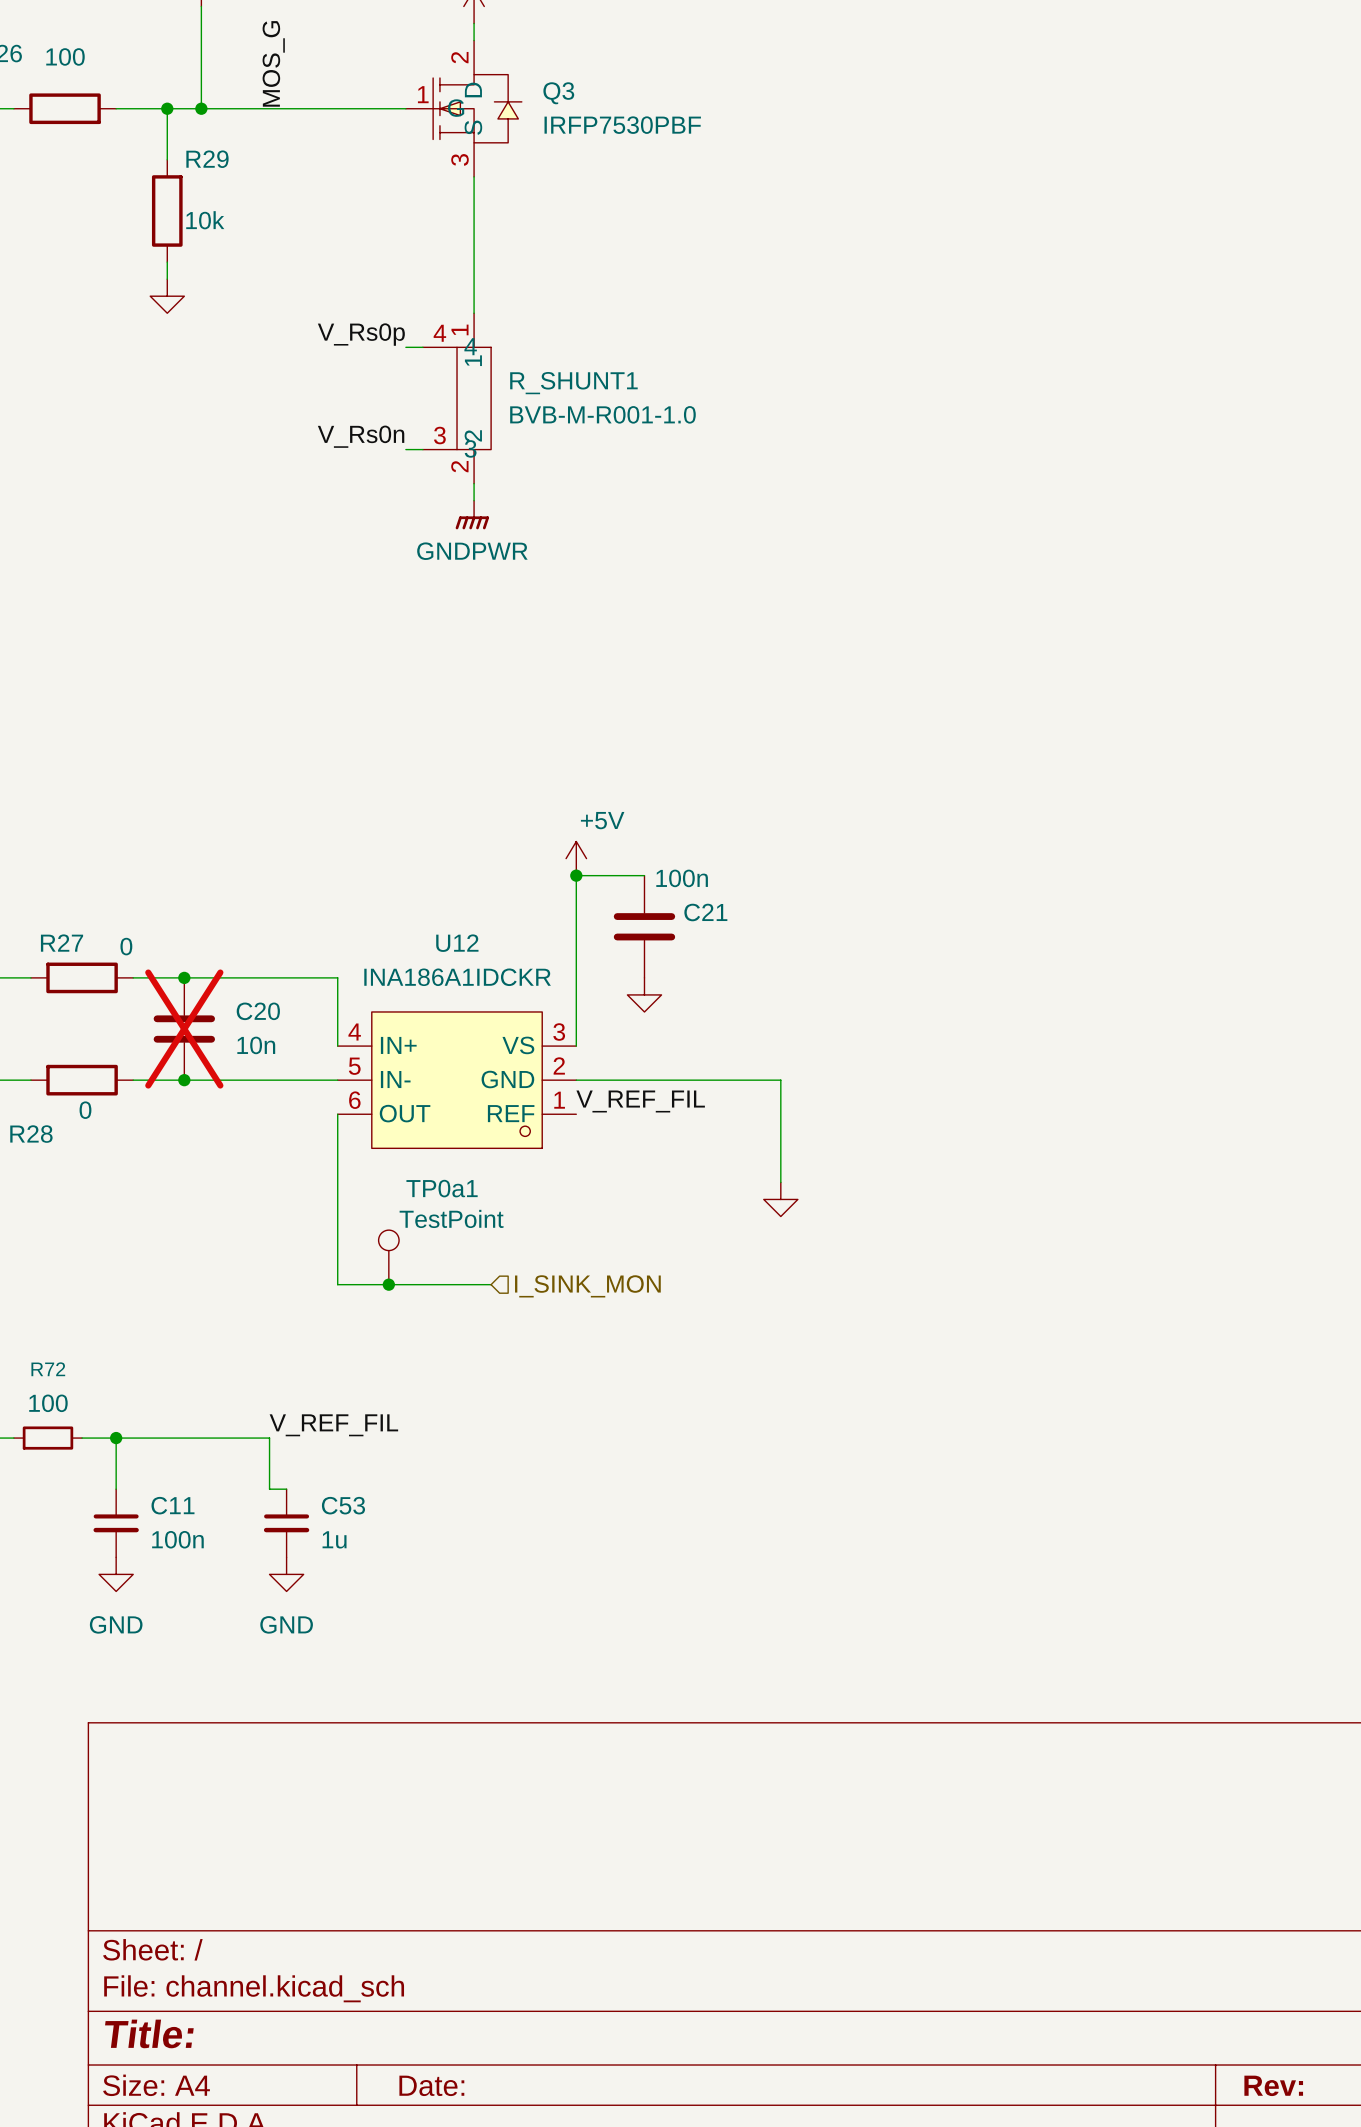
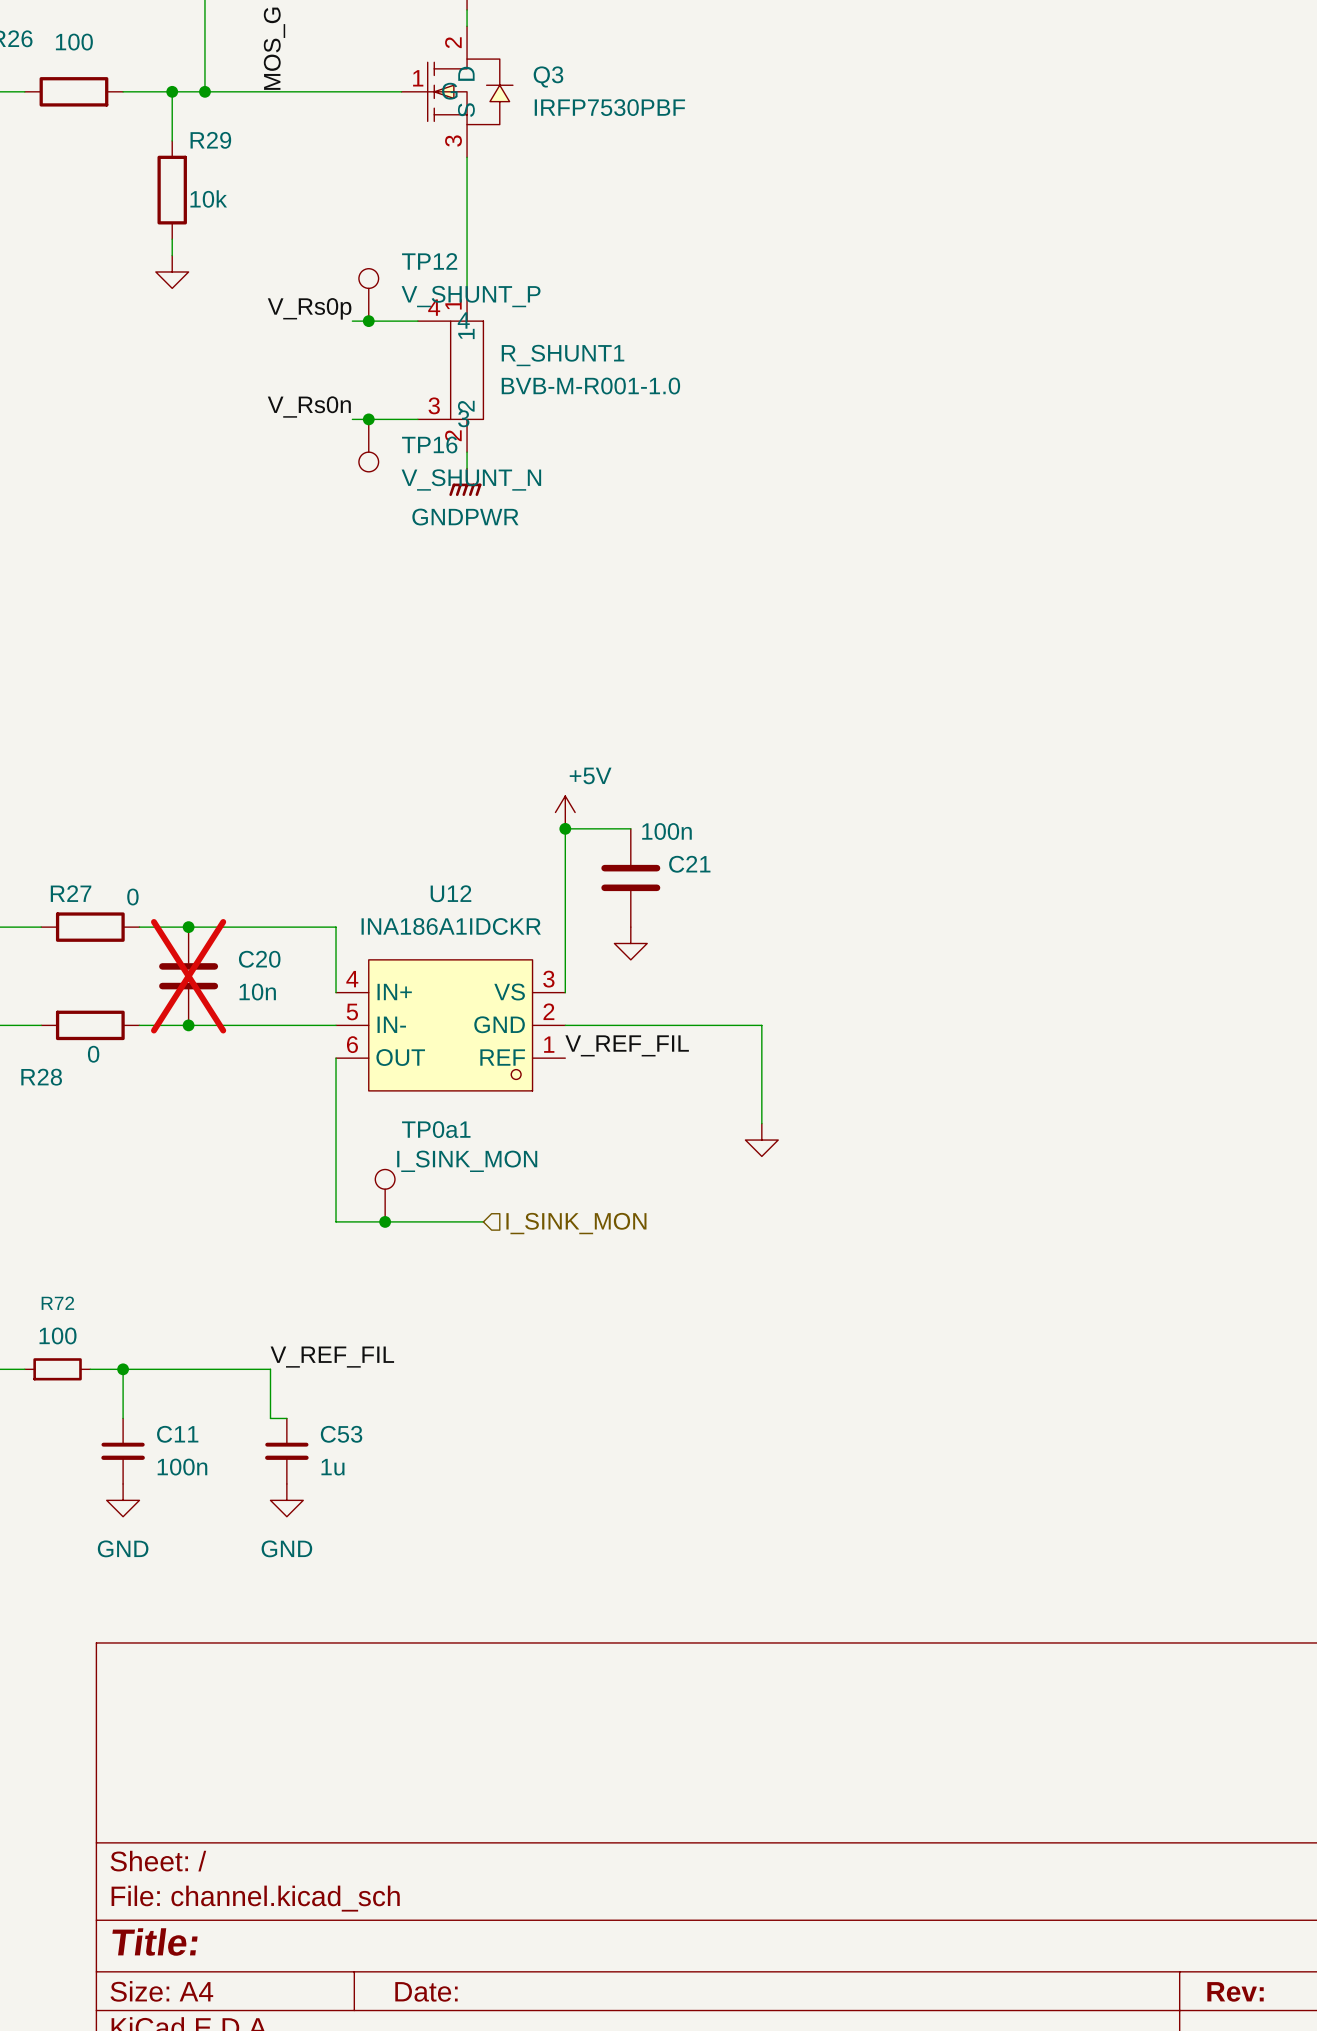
TP12: none -> V_SHUNT_P (368, 294)
label position: V_Rs0p (361, 334) -> V_Rs0p (309, 308)
wire: none -> (352, 321) (401, 321)
junction: none -> (368, 321)
label position: V_Rs0n (361, 436) -> V_Rs0n (309, 407)
wire: none -> (352, 419) (401, 419)
junction: none -> (368, 419)
TP16: none -> V_SHUNT_N (368, 445)
TP0a1 value: TestPoint (451, 1218) -> I_SINK_MON (467, 1161)

